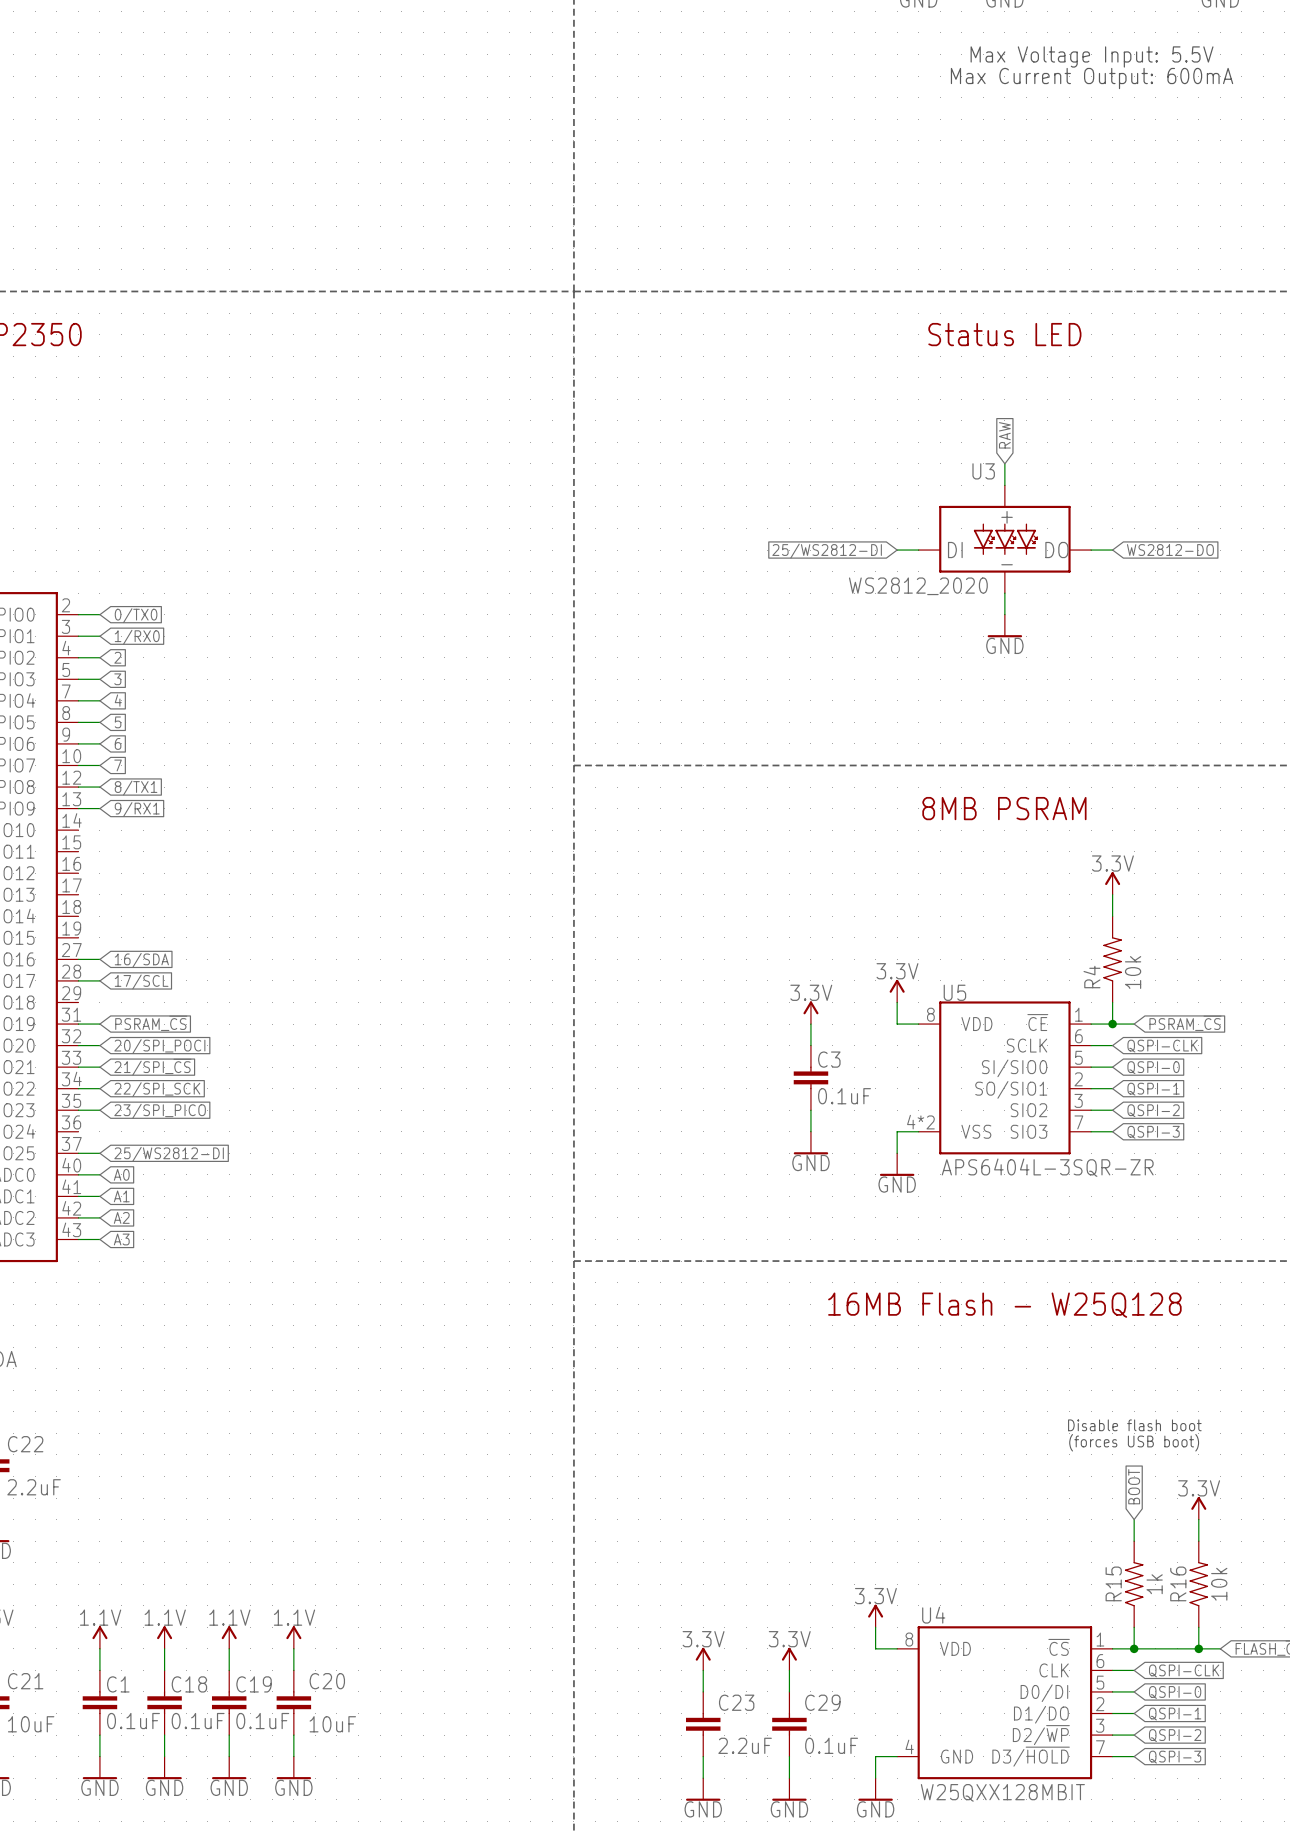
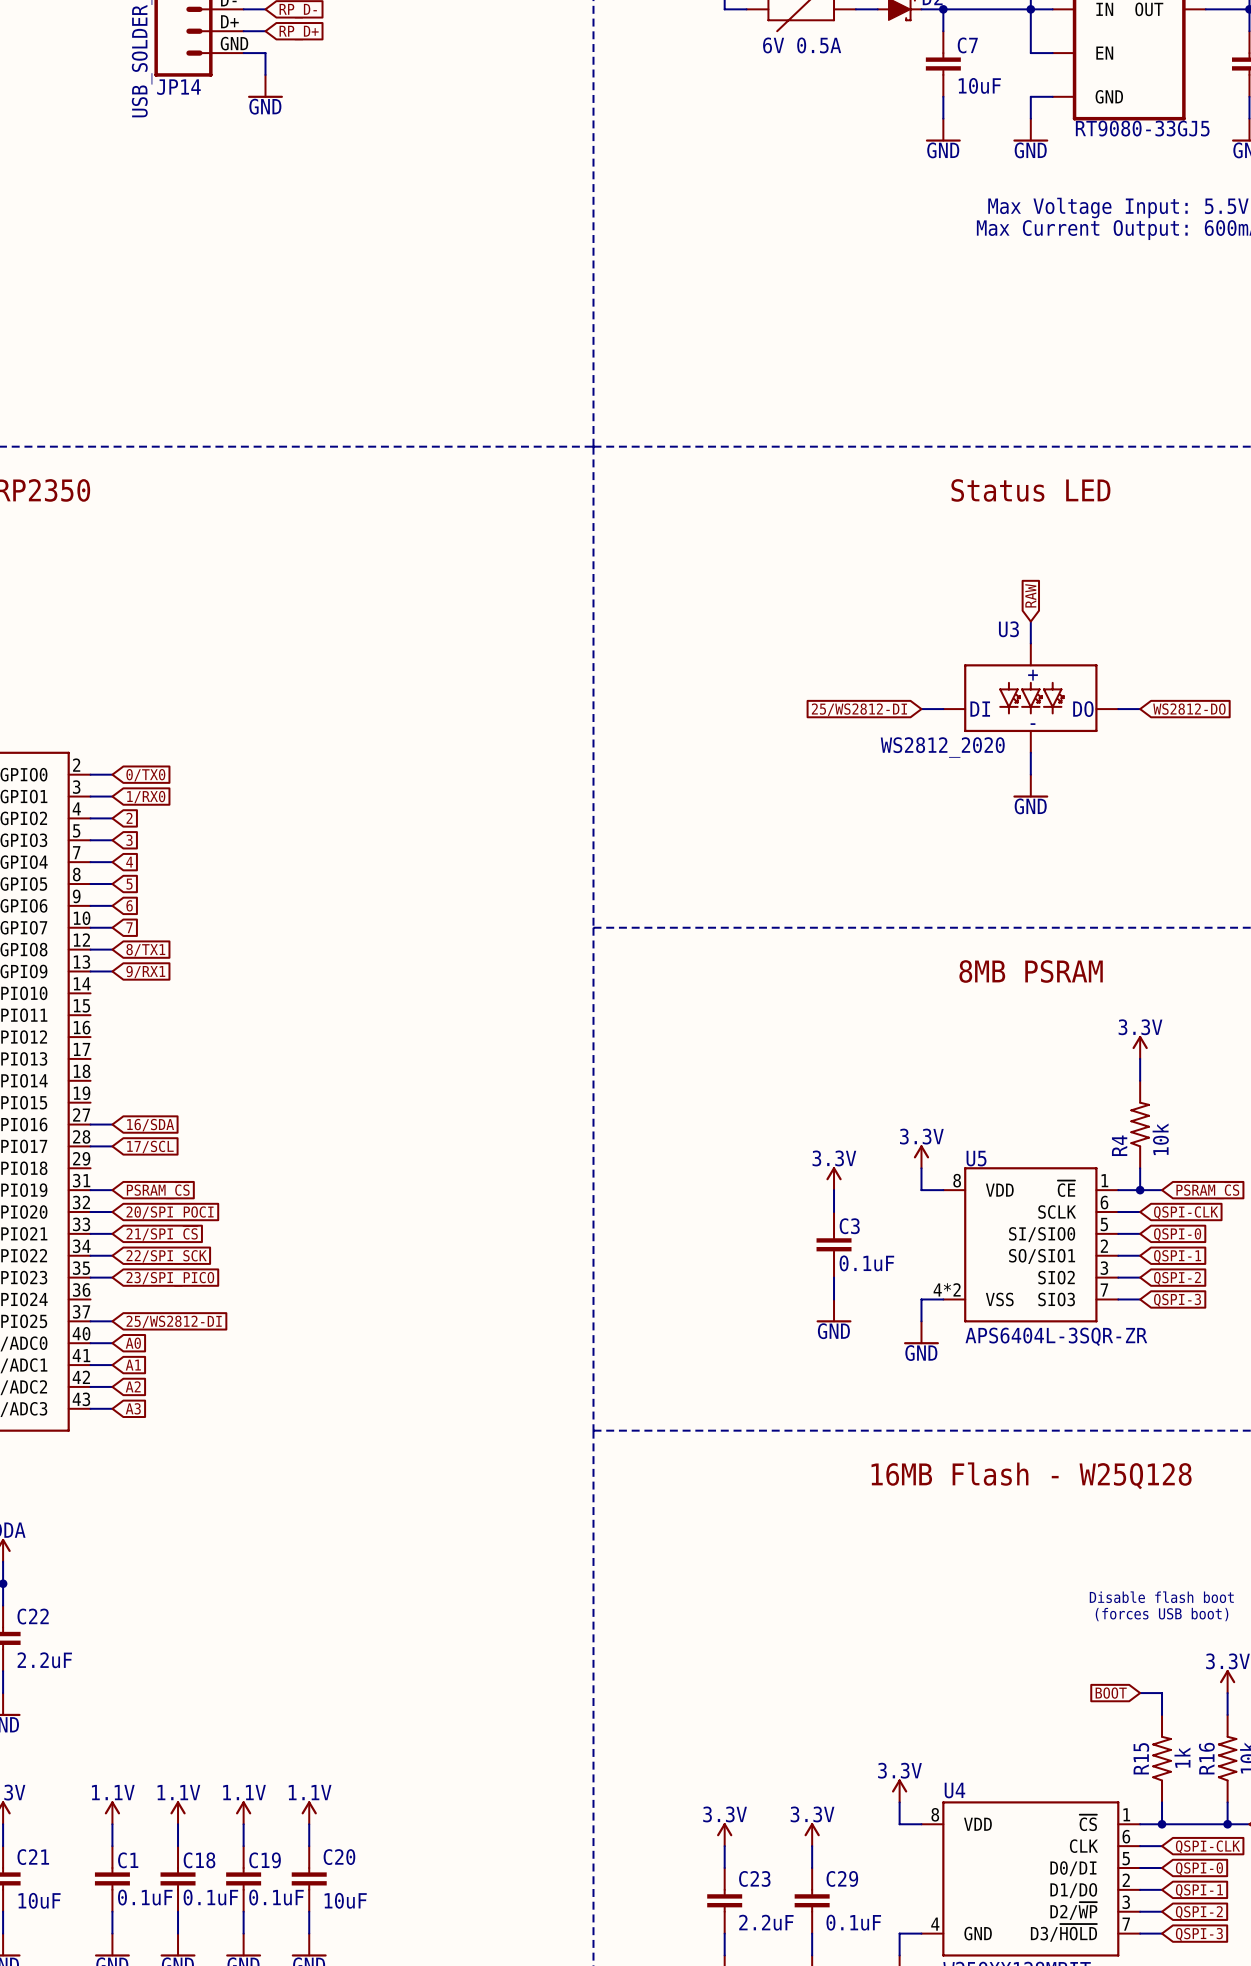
global label rotation: 0° (1134, 1486) -> 90° counterclockwise (1111, 1693)
wire: none -> (1140, 1693) (1162, 1693)

